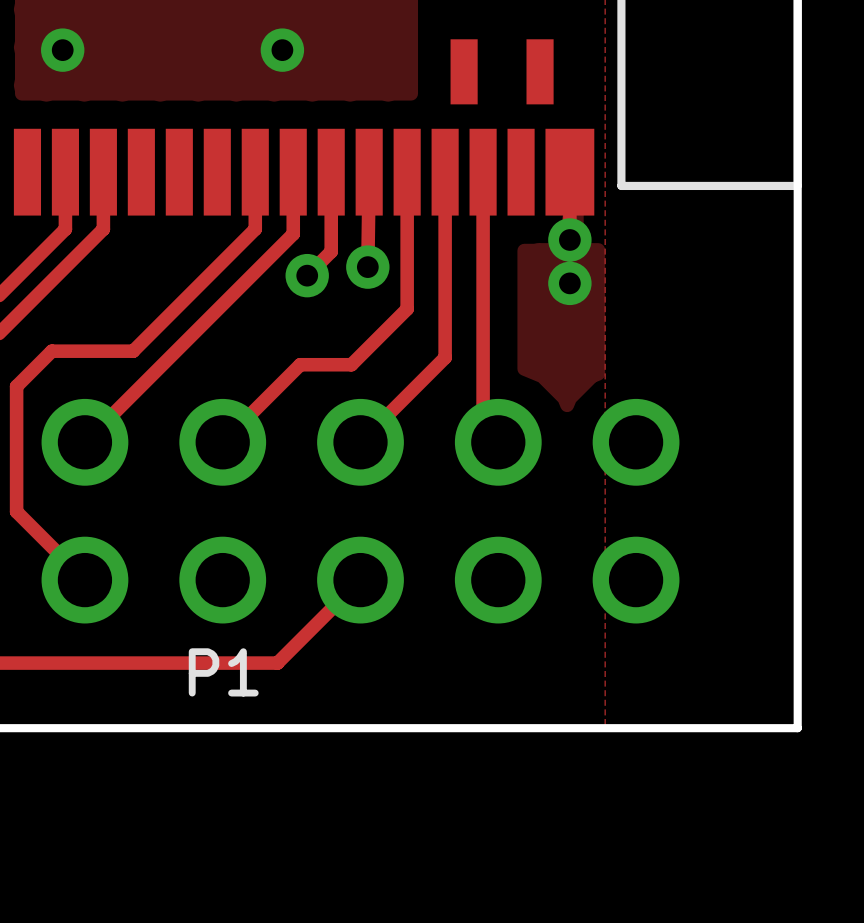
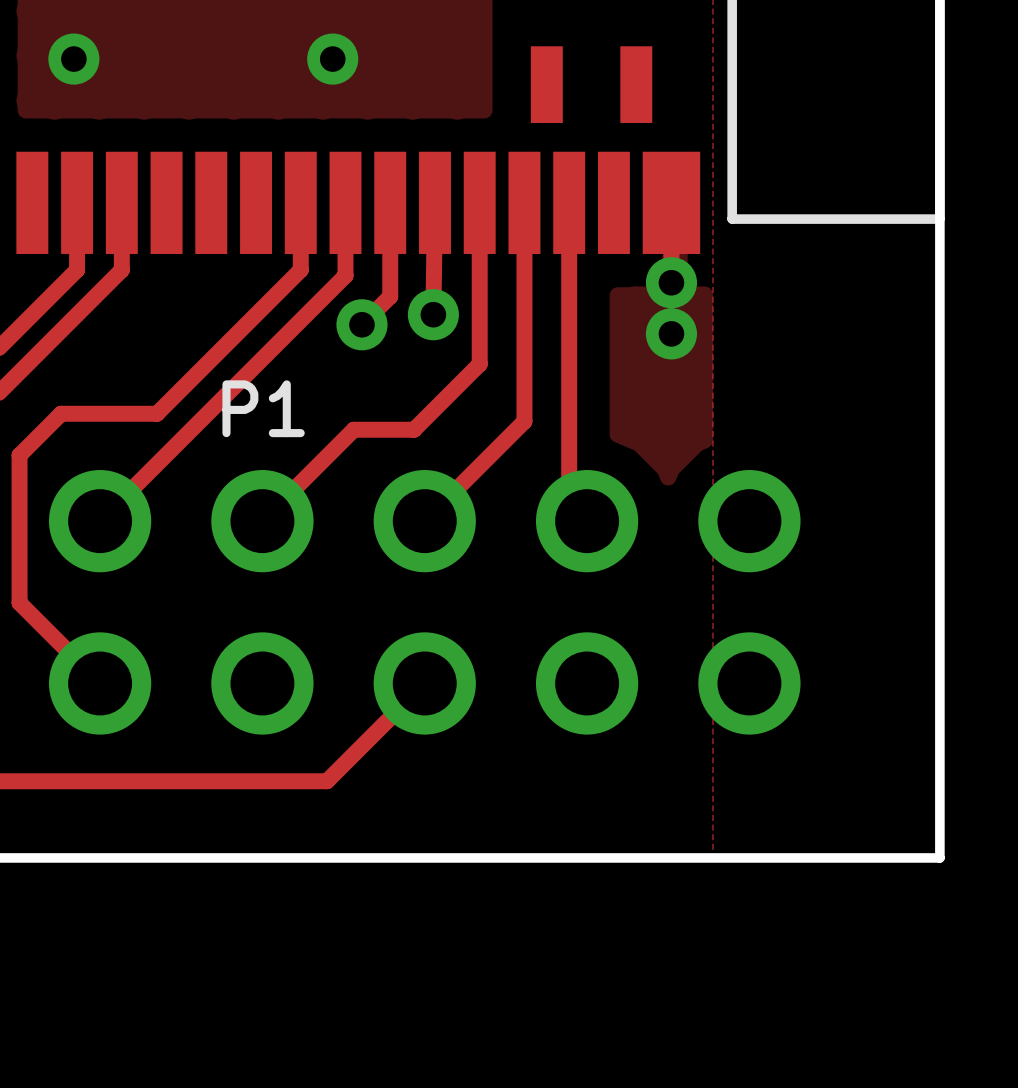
P1 name position: P1 (223, 672) -> P1 (263, 408)

